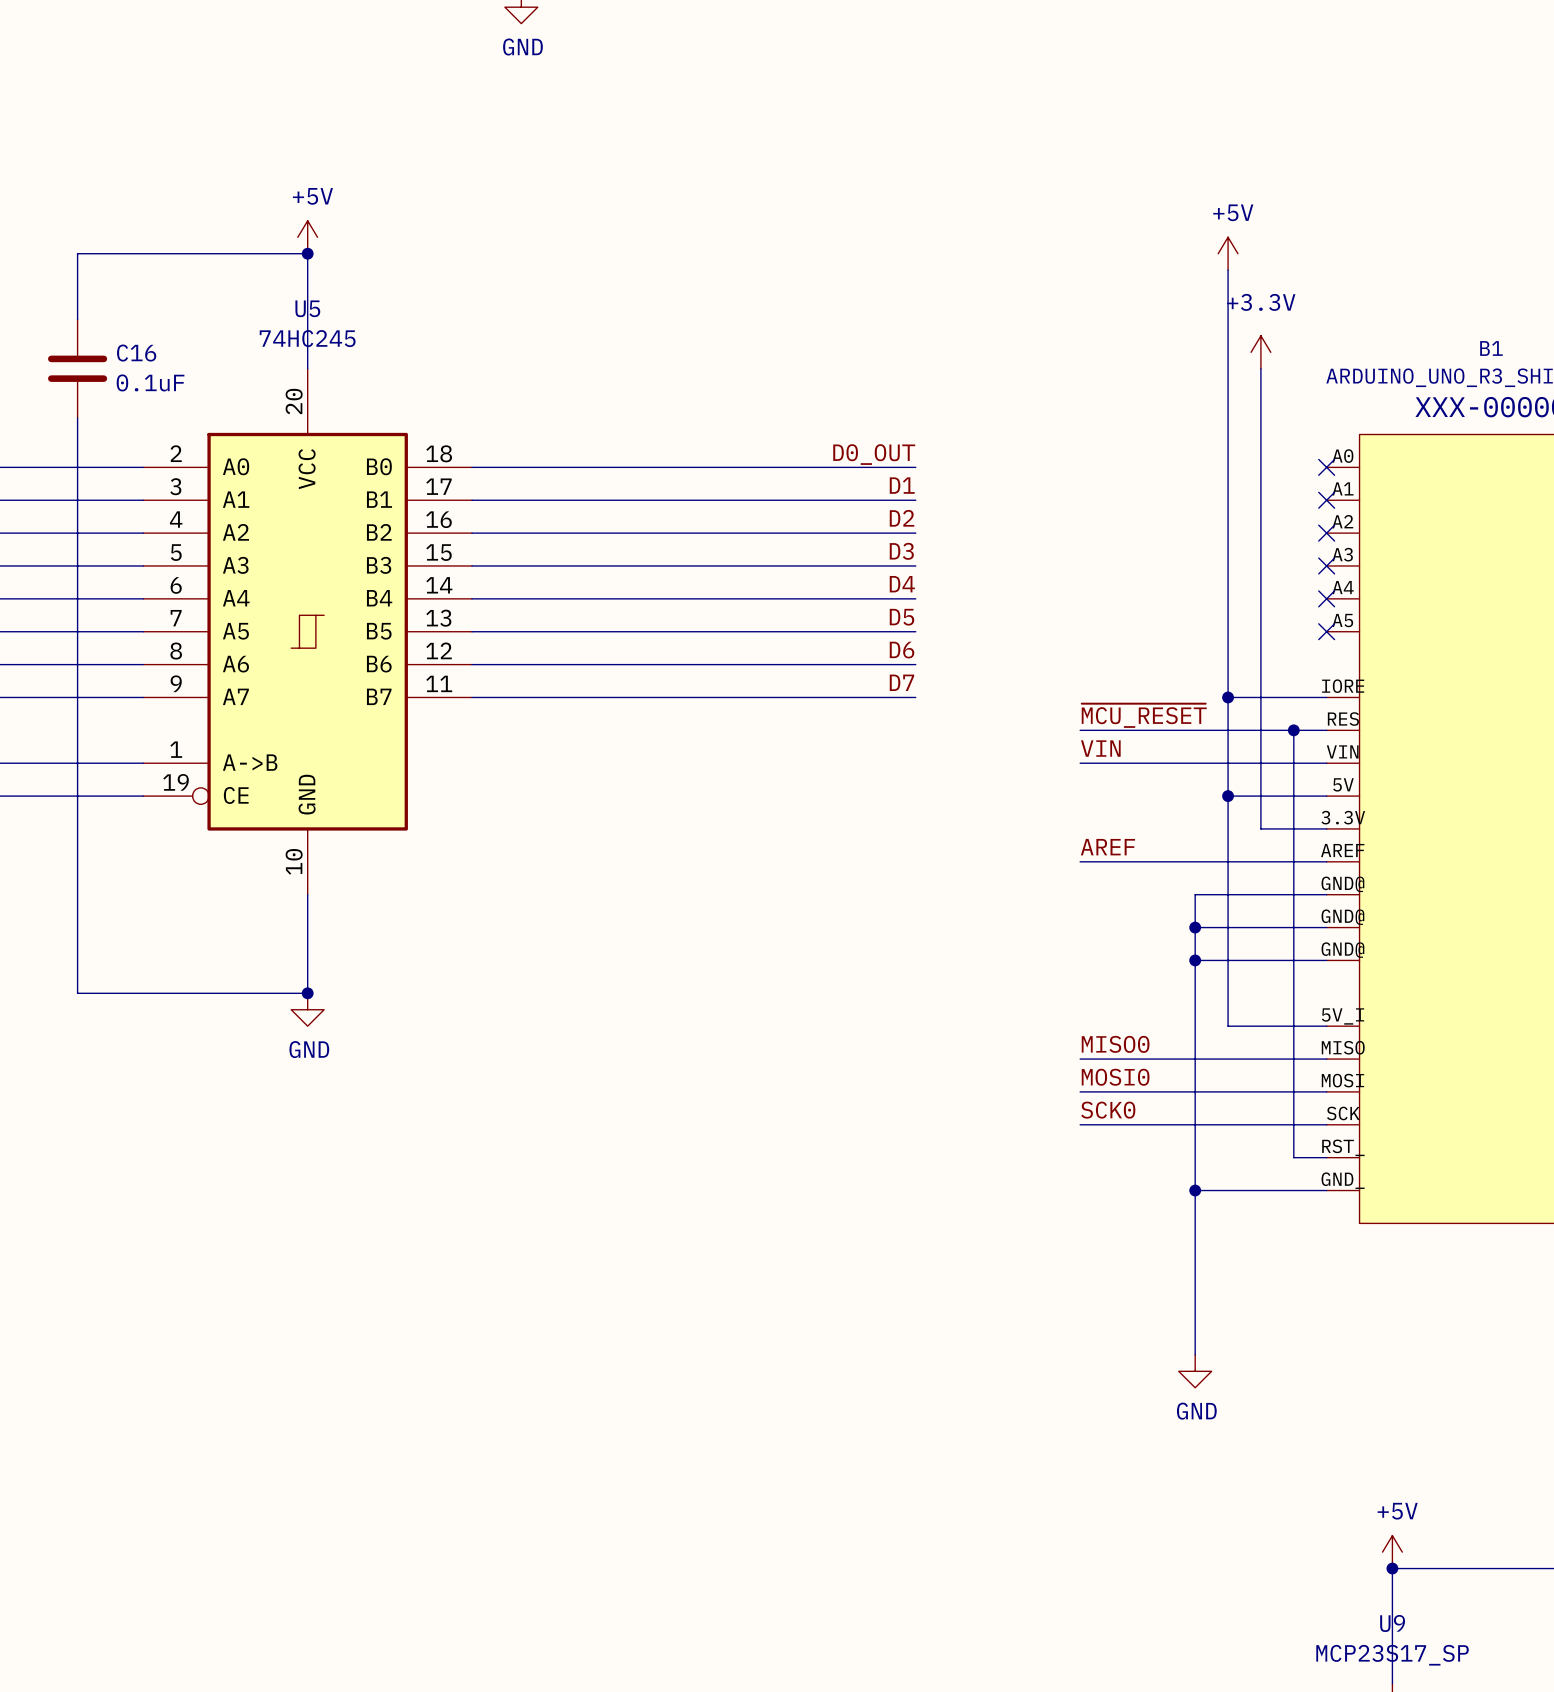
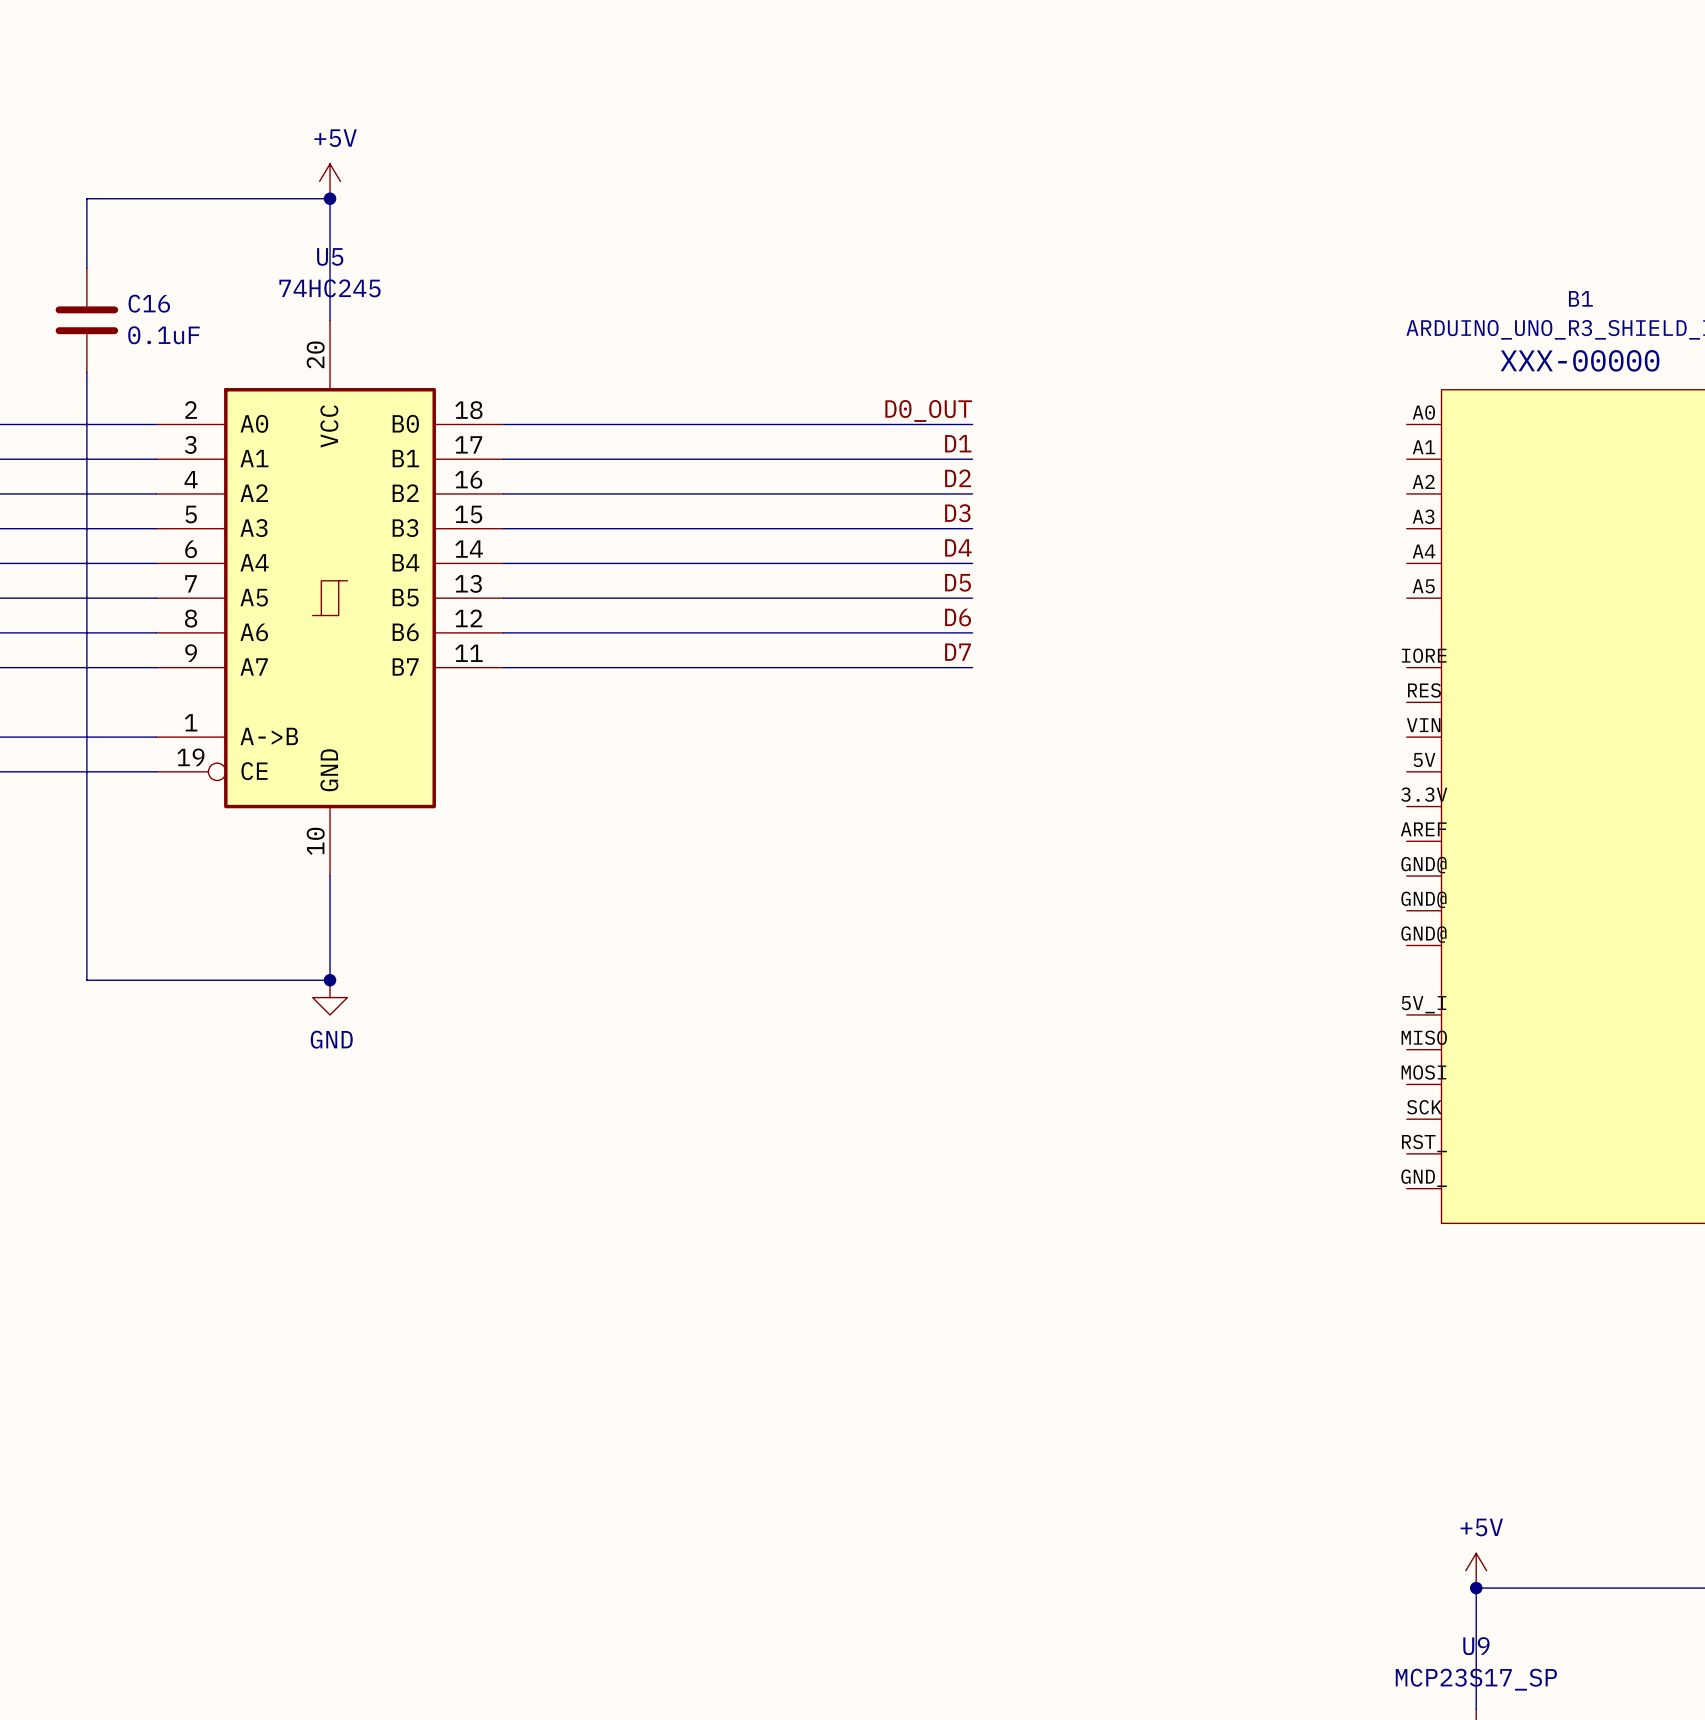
power symbol: +5V (1228, 253) -> none
wire: (1228, 270) (1228, 1026) (1326, 1026) -> none
power symbol: +3.3V (1260, 352) -> none
wire: (1260, 368) (1260, 828) (1326, 828) -> none
no-connect mark: (1326, 467) -> none
no-connect mark: (1326, 500) -> none
no-connect mark: (1326, 533) -> none
no-connect mark: (1326, 565) -> none
no-connect mark: (1326, 598) -> none
no-connect mark: (1326, 631) -> none
wire: (1228, 697) (1326, 697) -> none
junction: (1228, 697) -> none
label: ~{MCU_RESET} (1144, 715) -> none
wire: (1080, 730) (1326, 730) -> none
wire: (1293, 730) (1293, 1157) (1326, 1157) -> none
junction: (1293, 730) -> none
label: VIN (1100, 748) -> none
wire: (1080, 763) (1326, 763) -> none
wire: (1228, 796) (1326, 796) -> none
junction: (1228, 796) -> none
label: AREF (1107, 847) -> none
wire: (1080, 861) (1326, 861) -> none
wire: (1326, 894) (1195, 894) (1195, 1354) -> none
wire: (1195, 927) (1326, 927) -> none
junction: (1195, 927) -> none
wire: (1195, 960) (1326, 960) -> none
junction: (1195, 960) -> none
label: MISO0 (1115, 1044) -> none
wire: (1080, 1059) (1326, 1059) -> none
label: MOSI0 (1115, 1077) -> none
wire: (1080, 1091) (1326, 1091) -> none
label: SCK0 (1108, 1110) -> none
wire: (1080, 1124) (1326, 1124) -> none
wire: (1195, 1190) (1326, 1190) -> none
junction: (1195, 1190) -> none
power symbol: GND (1195, 1371) -> none

